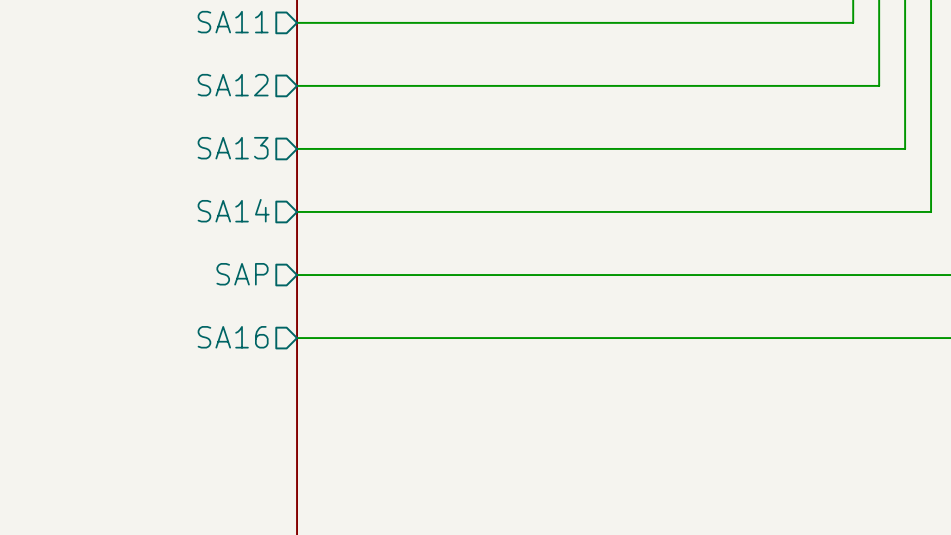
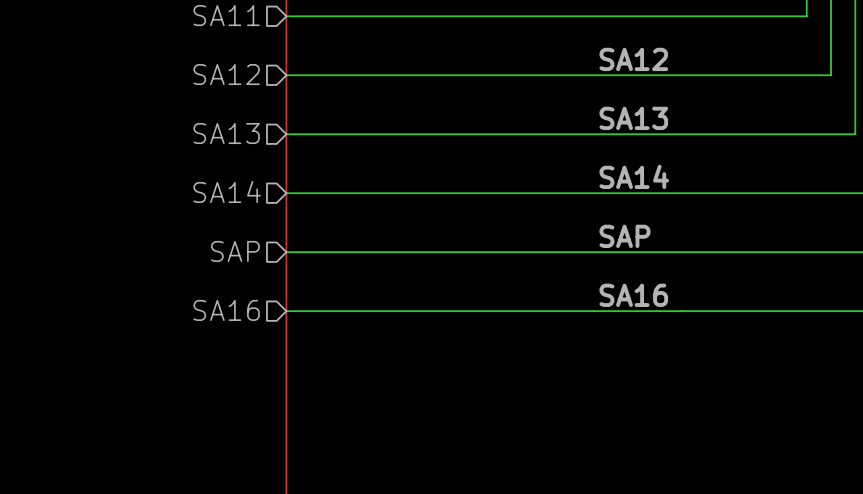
label: none -> SA12 (633, 59)
label: none -> SA13 (633, 118)
label: none -> SA14 (634, 176)
label: none -> SAP (624, 236)
label: none -> SA16 (633, 295)

